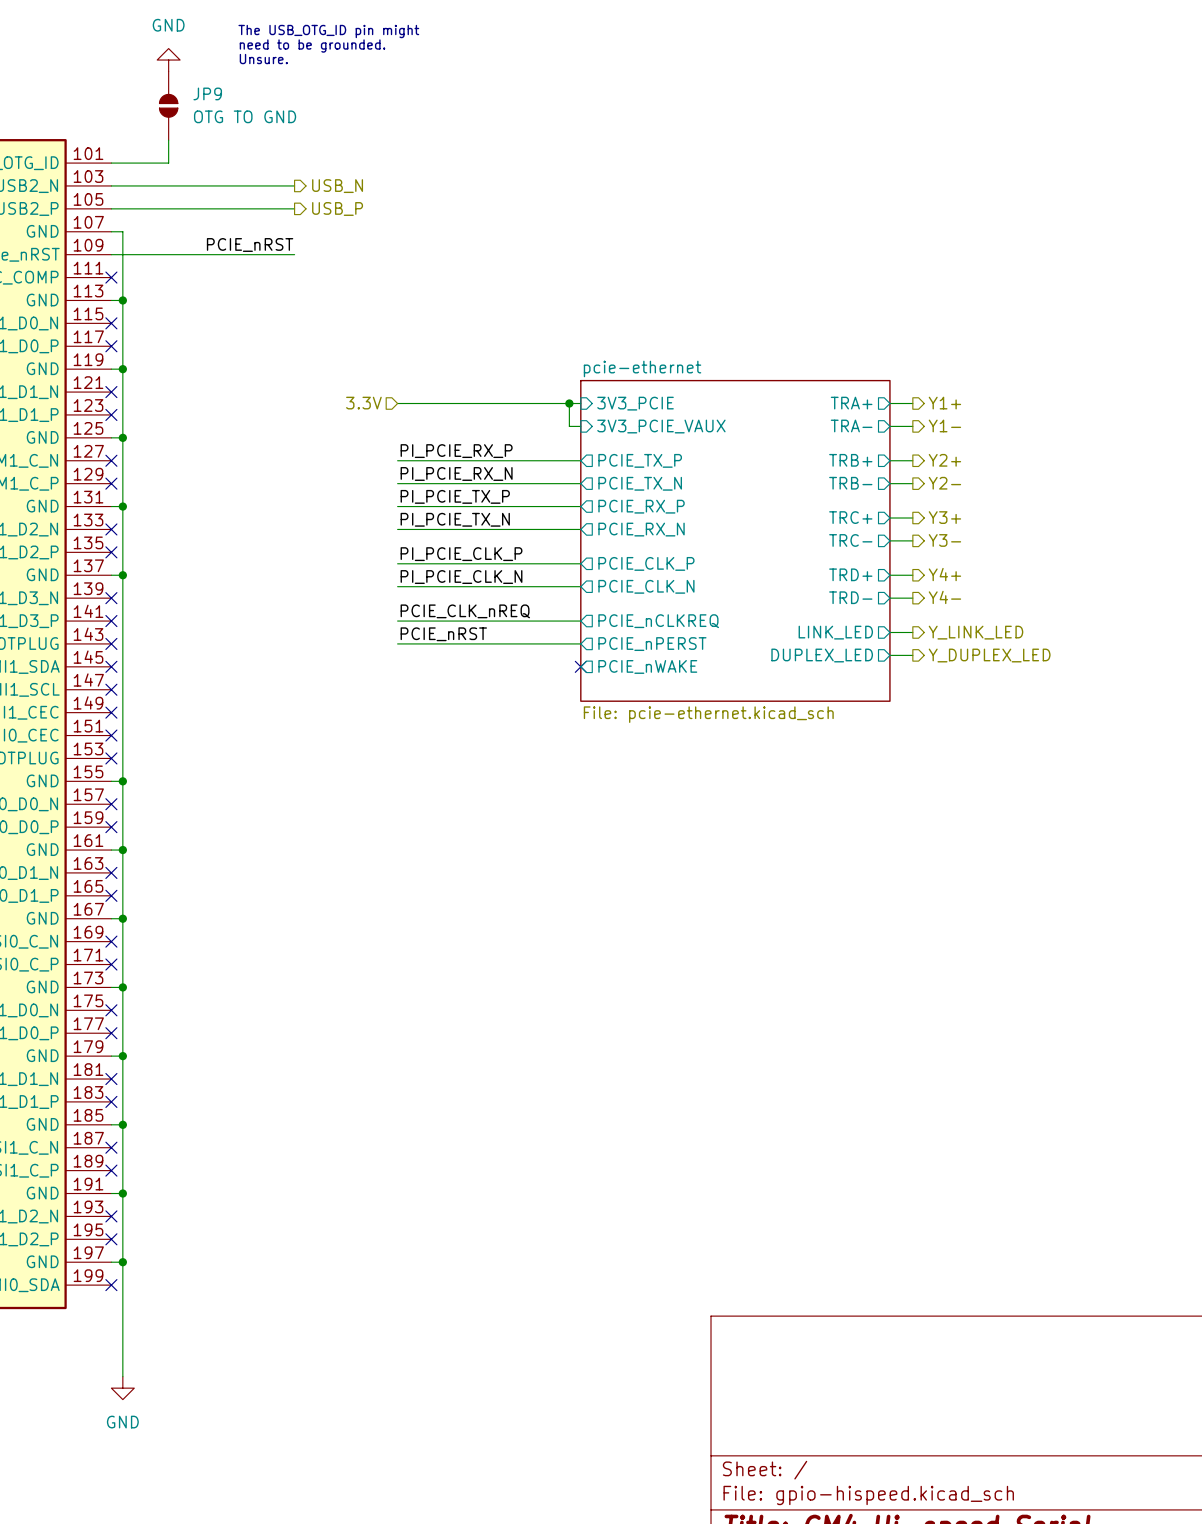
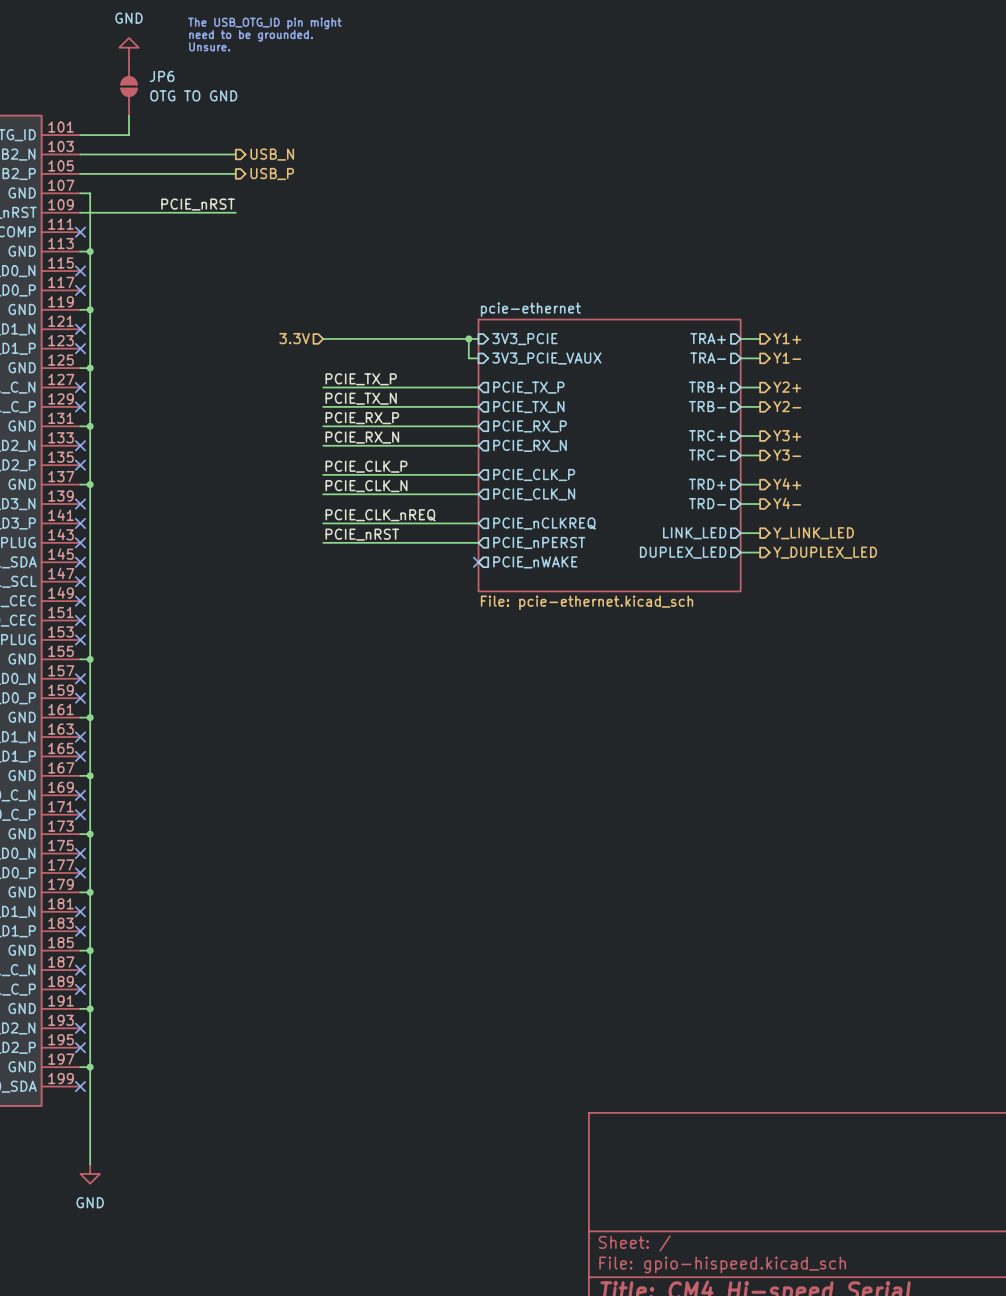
JP9 name: JP9 (207, 93) -> JP6 (162, 76)
label: PI_PCIE_RX_P (456, 451) -> PCIE_TX_P (361, 379)
label: PI_PCIE_RX_N (456, 473) -> PCIE_TX_N (361, 398)
label: PI_PCIE_TX_P (455, 496) -> PCIE_RX_P (362, 418)
label: PI_PCIE_TX_N (455, 519) -> PCIE_RX_N (362, 437)
label: PI_PCIE_CLK_P (461, 554) -> PCIE_CLK_P (366, 466)
label: PI_PCIE_CLK_N (461, 577) -> PCIE_CLK_N (366, 486)

